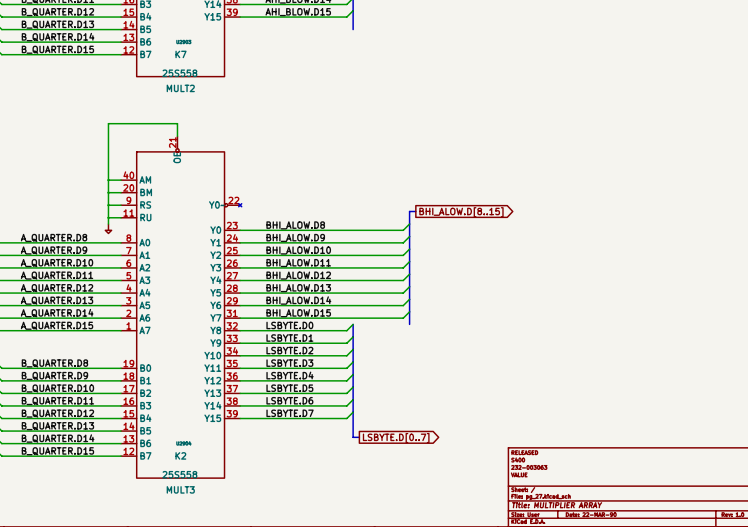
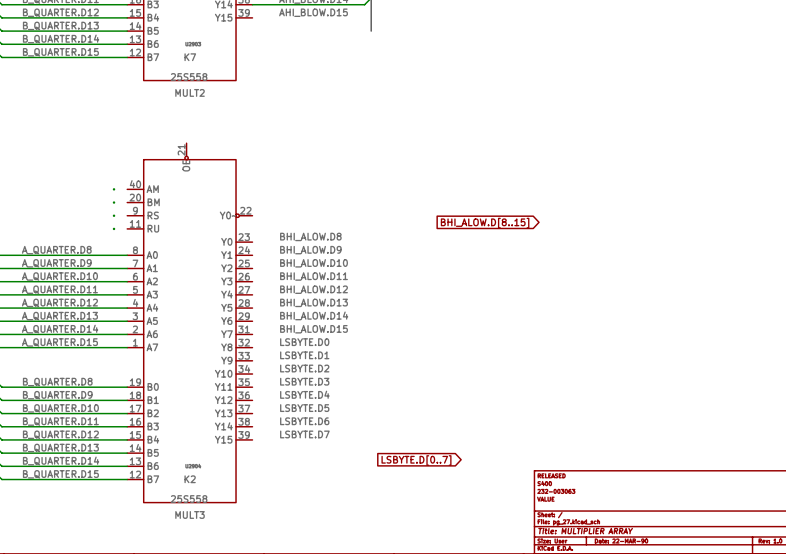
wire: (353, 10) (346, 17) (240, 17) -> none
wire: (177, 136) (177, 123) (108, 123) (108, 224) -> none
wire: (108, 180) (121, 180) -> none
wire: (108, 192) (121, 192) -> none
wire: (108, 205) (121, 205) -> none
no-connect mark: (240, 205) -> none
bus: (415, 211) (409, 211) (409, 324) -> none
wire: (108, 217) (121, 217) -> none
wire: (409, 224) (403, 230) (240, 230) -> none
power symbol: (108, 228) -> none
wire: (409, 236) (403, 242) (240, 242) -> none
wire: (409, 249) (403, 255) (240, 255) -> none
wire: (409, 261) (403, 267) (240, 267) -> none
wire: (409, 274) (403, 280) (240, 280) -> none
wire: (409, 286) (403, 293) (240, 293) -> none
wire: (409, 299) (403, 305) (240, 305) -> none
wire: (409, 311) (403, 318) (240, 318) -> none
bus: (353, 324) (353, 437) (359, 437) -> none
wire: (353, 324) (346, 330) (240, 330) -> none
wire: (353, 336) (346, 343) (240, 343) -> none
wire: (353, 349) (346, 355) (240, 355) -> none
wire: (353, 362) (346, 368) (240, 368) -> none
wire: (353, 374) (346, 380) (240, 380) -> none
wire: (353, 387) (346, 393) (240, 393) -> none
wire: (353, 399) (346, 405) (240, 405) -> none
wire: (353, 412) (346, 418) (240, 418) -> none

